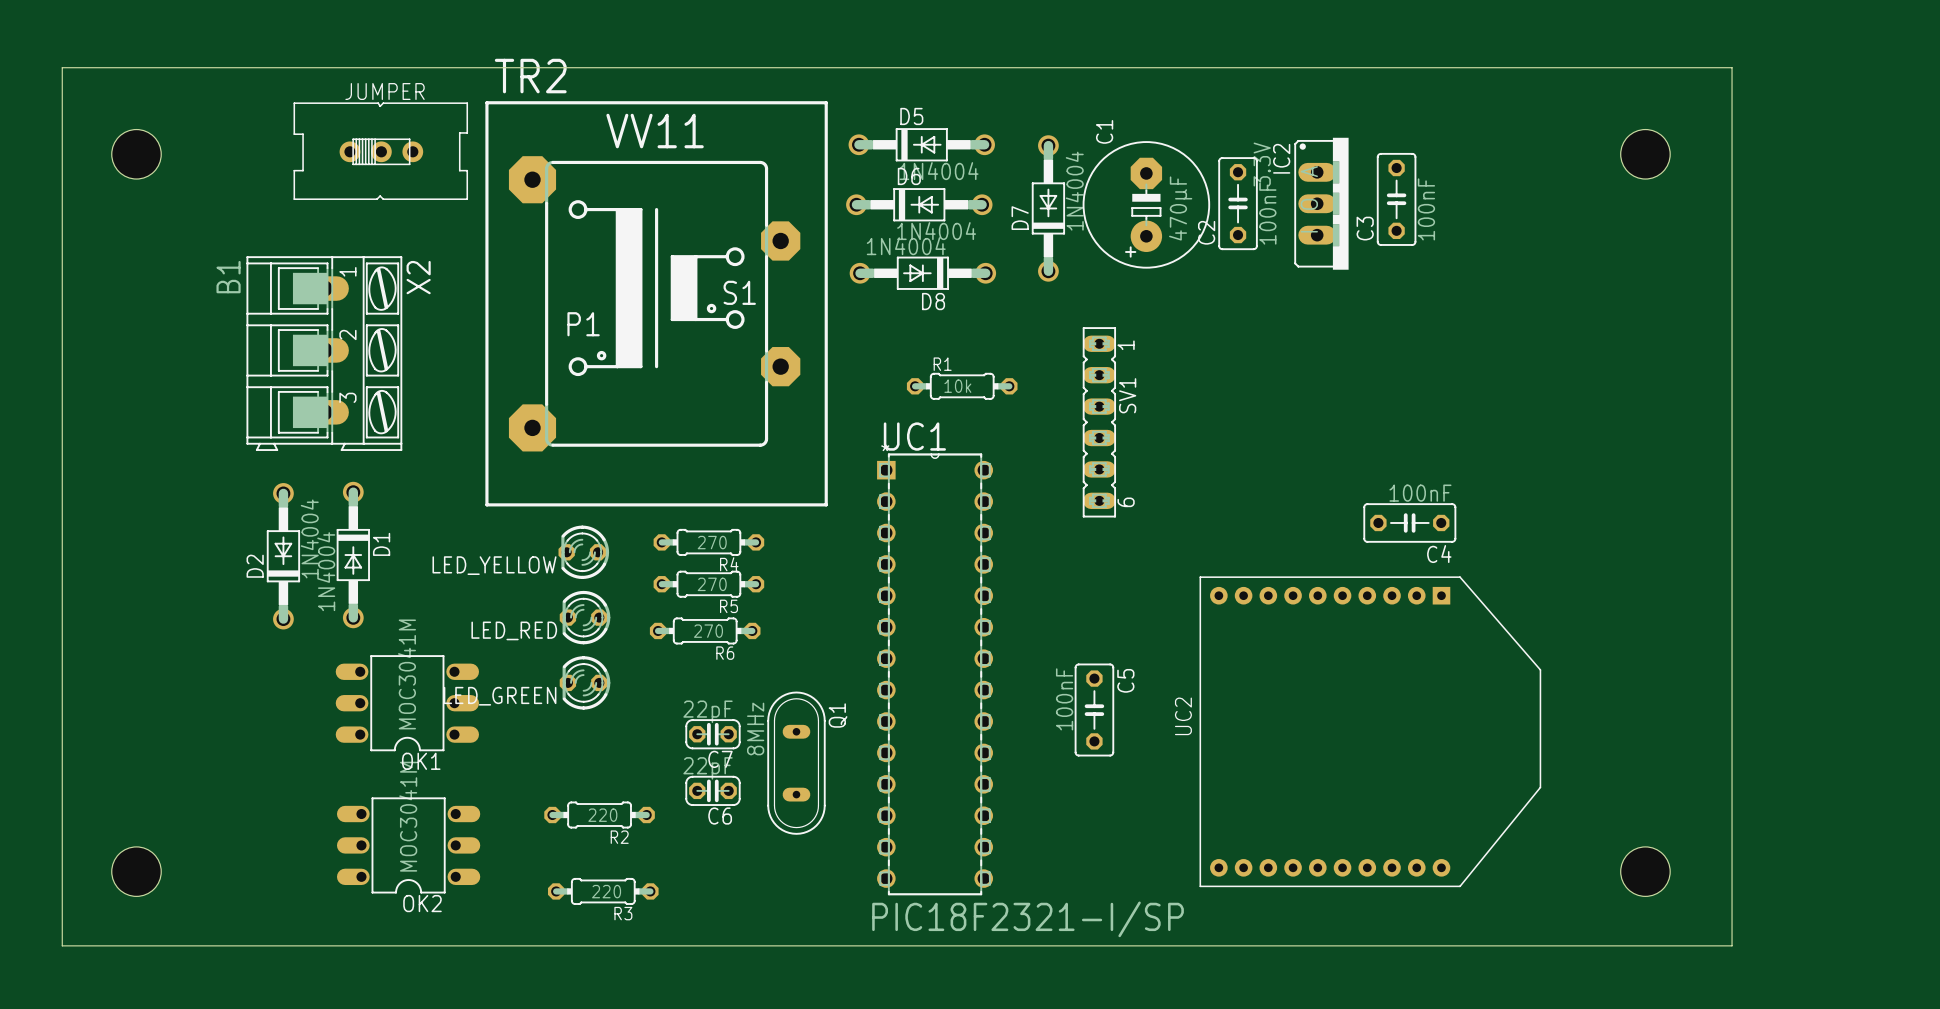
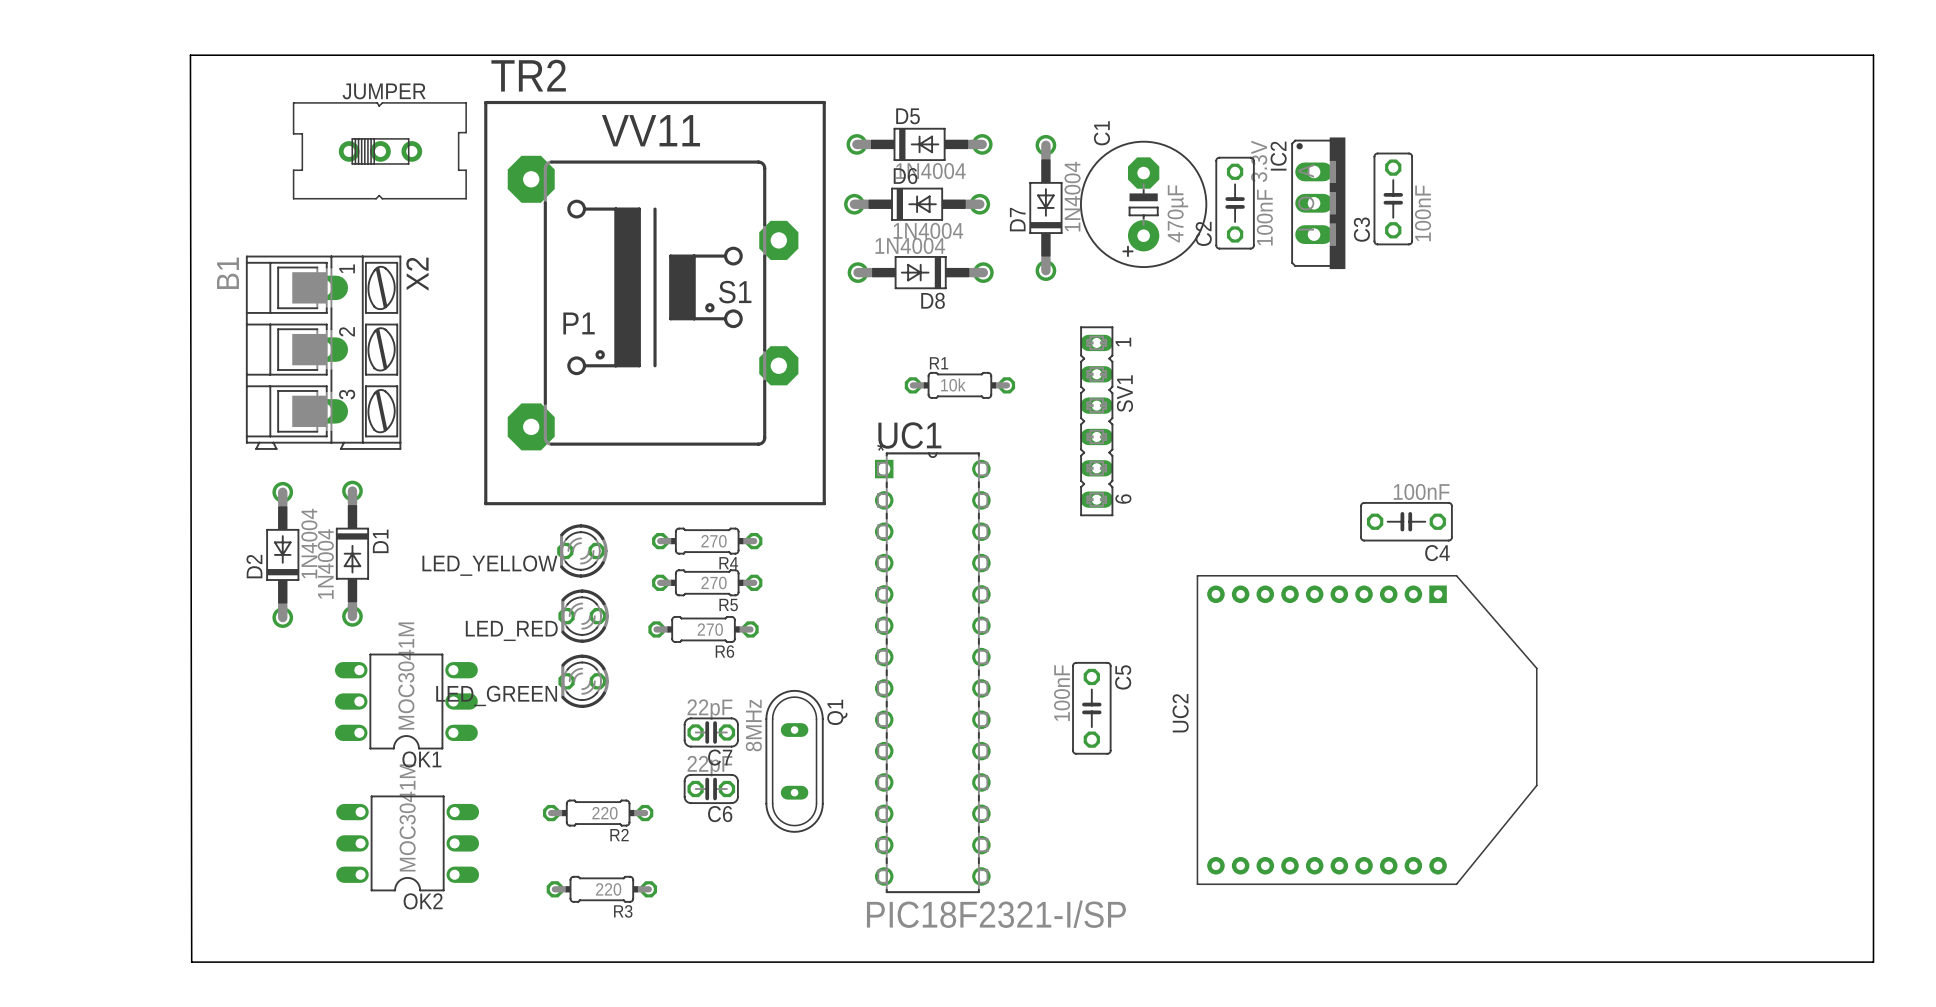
board edge: (62, 67) (1732, 67) (1732, 945) (62, 945) (62, 67) -> (190, 55) (191, 962) (1873, 962) (1873, 55) (190, 55)
hole: (136, 154) -> none
hole: (1645, 154) -> none
hole: (136, 871) -> none
hole: (1645, 871) -> none

